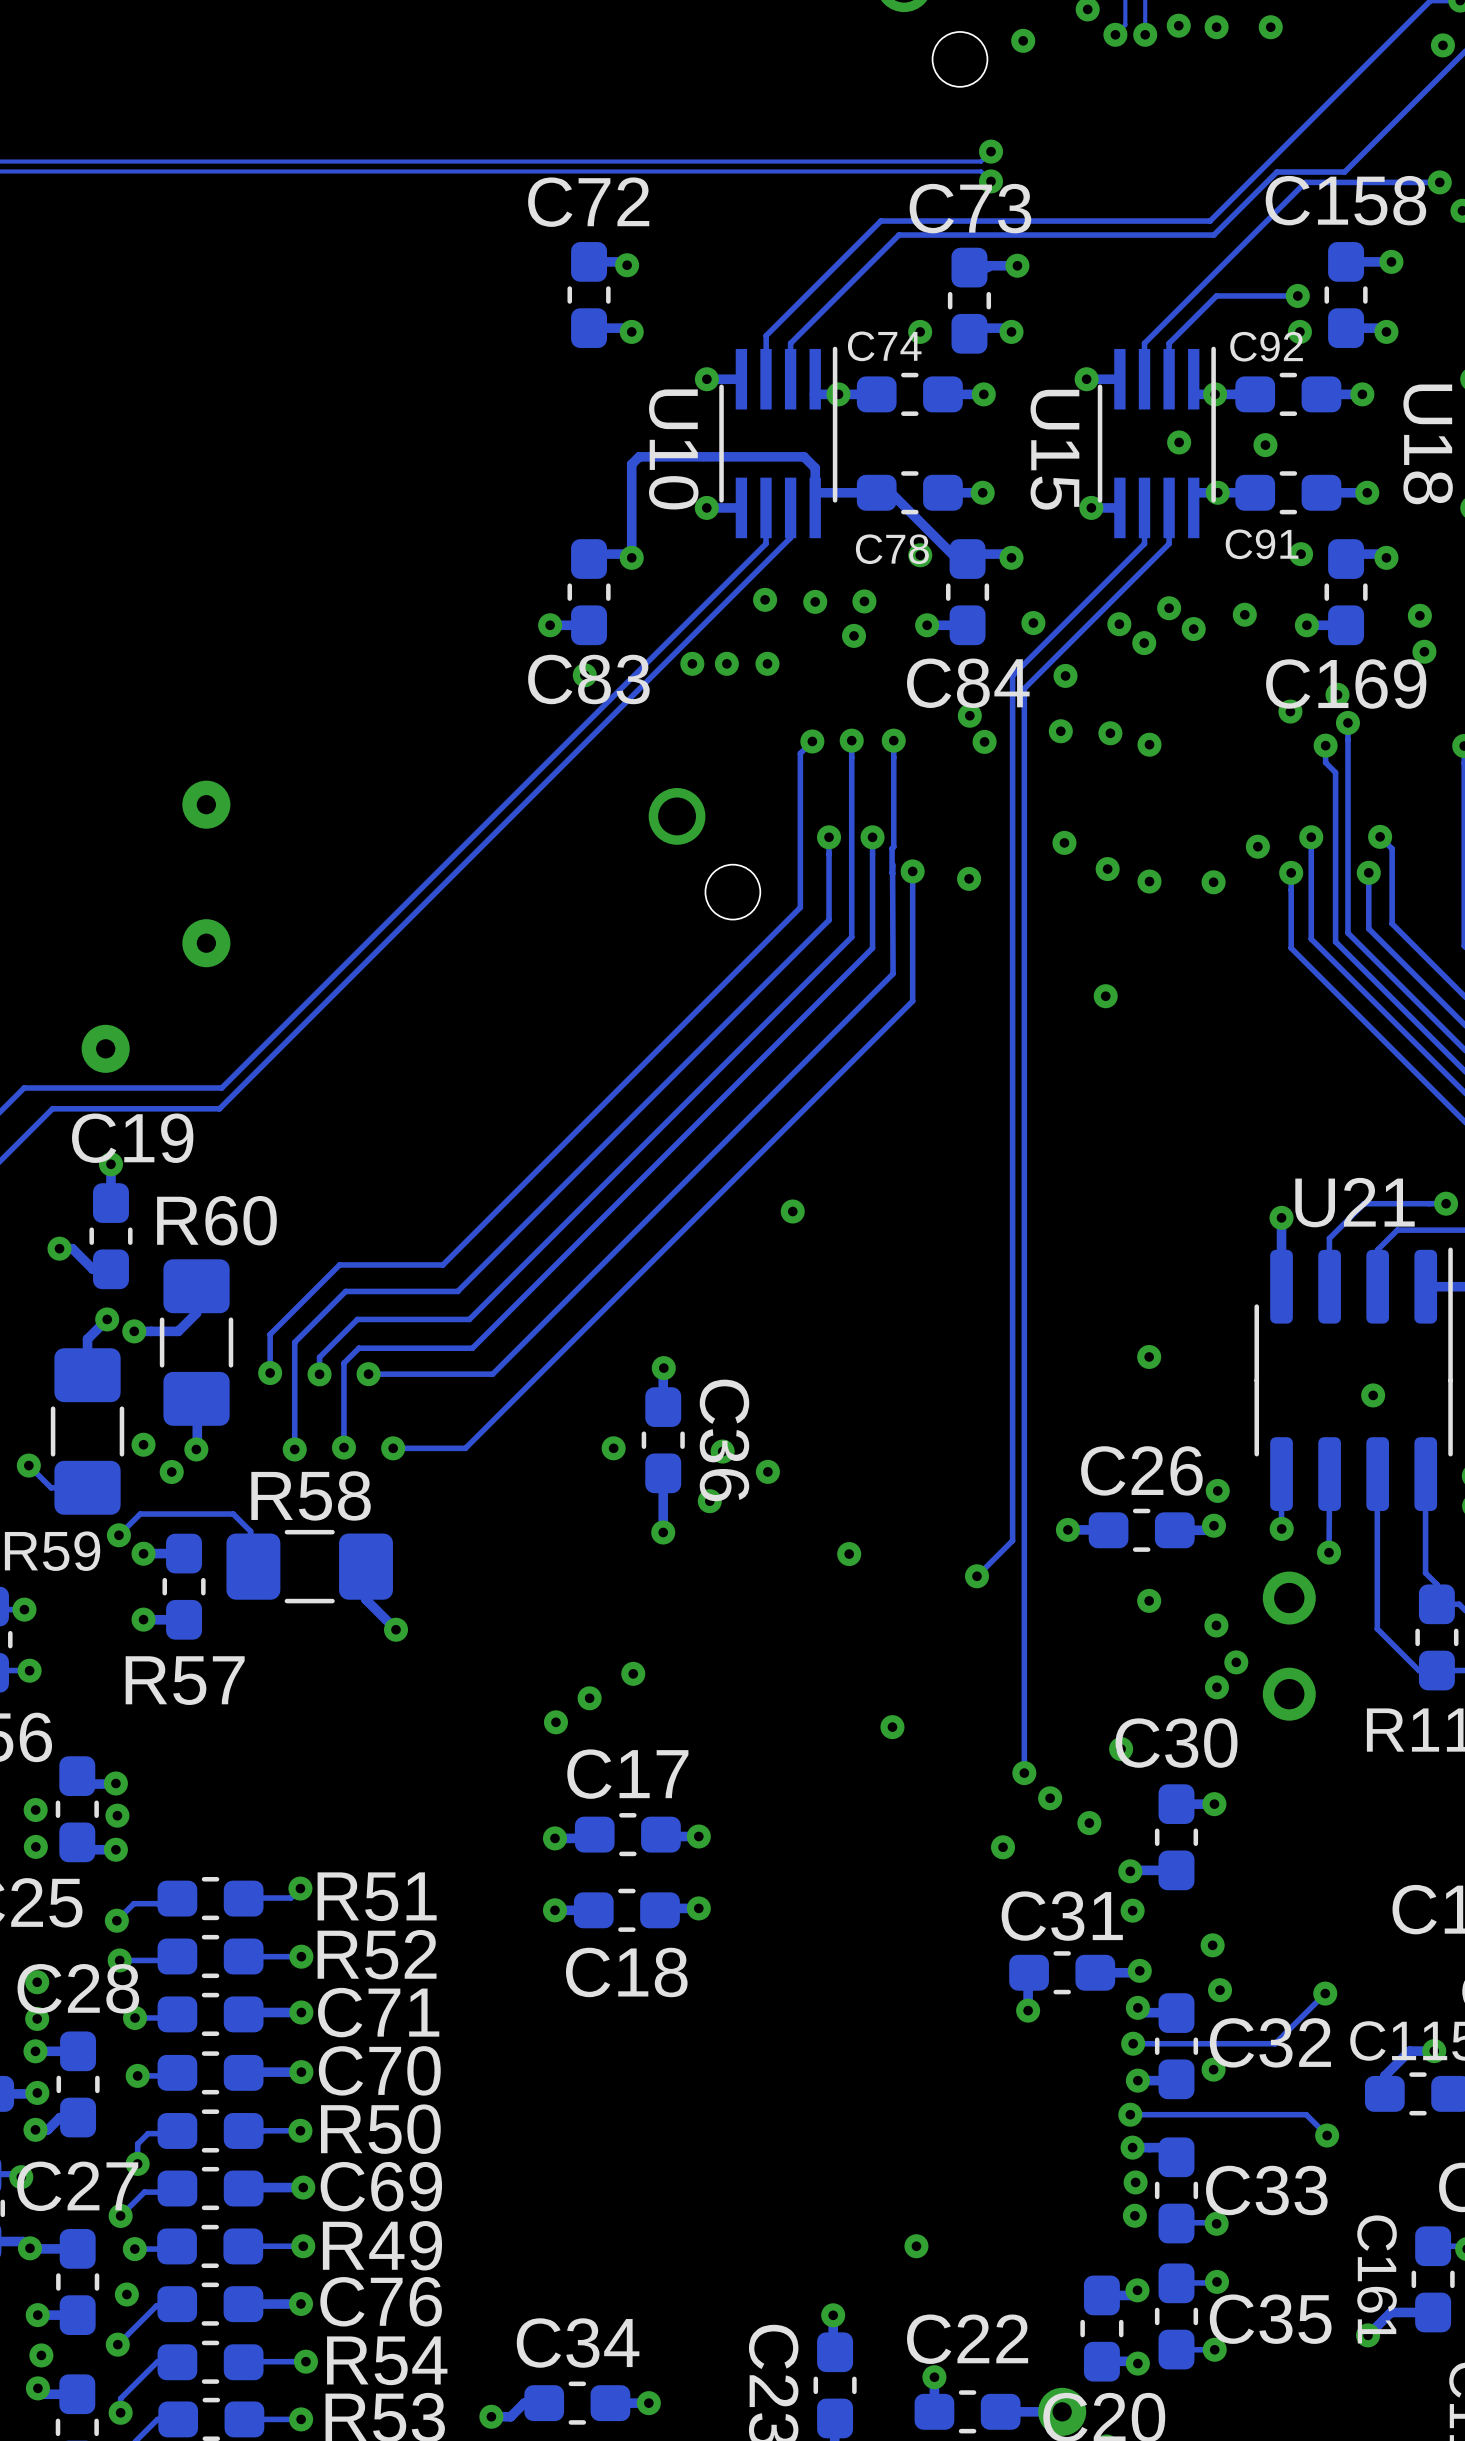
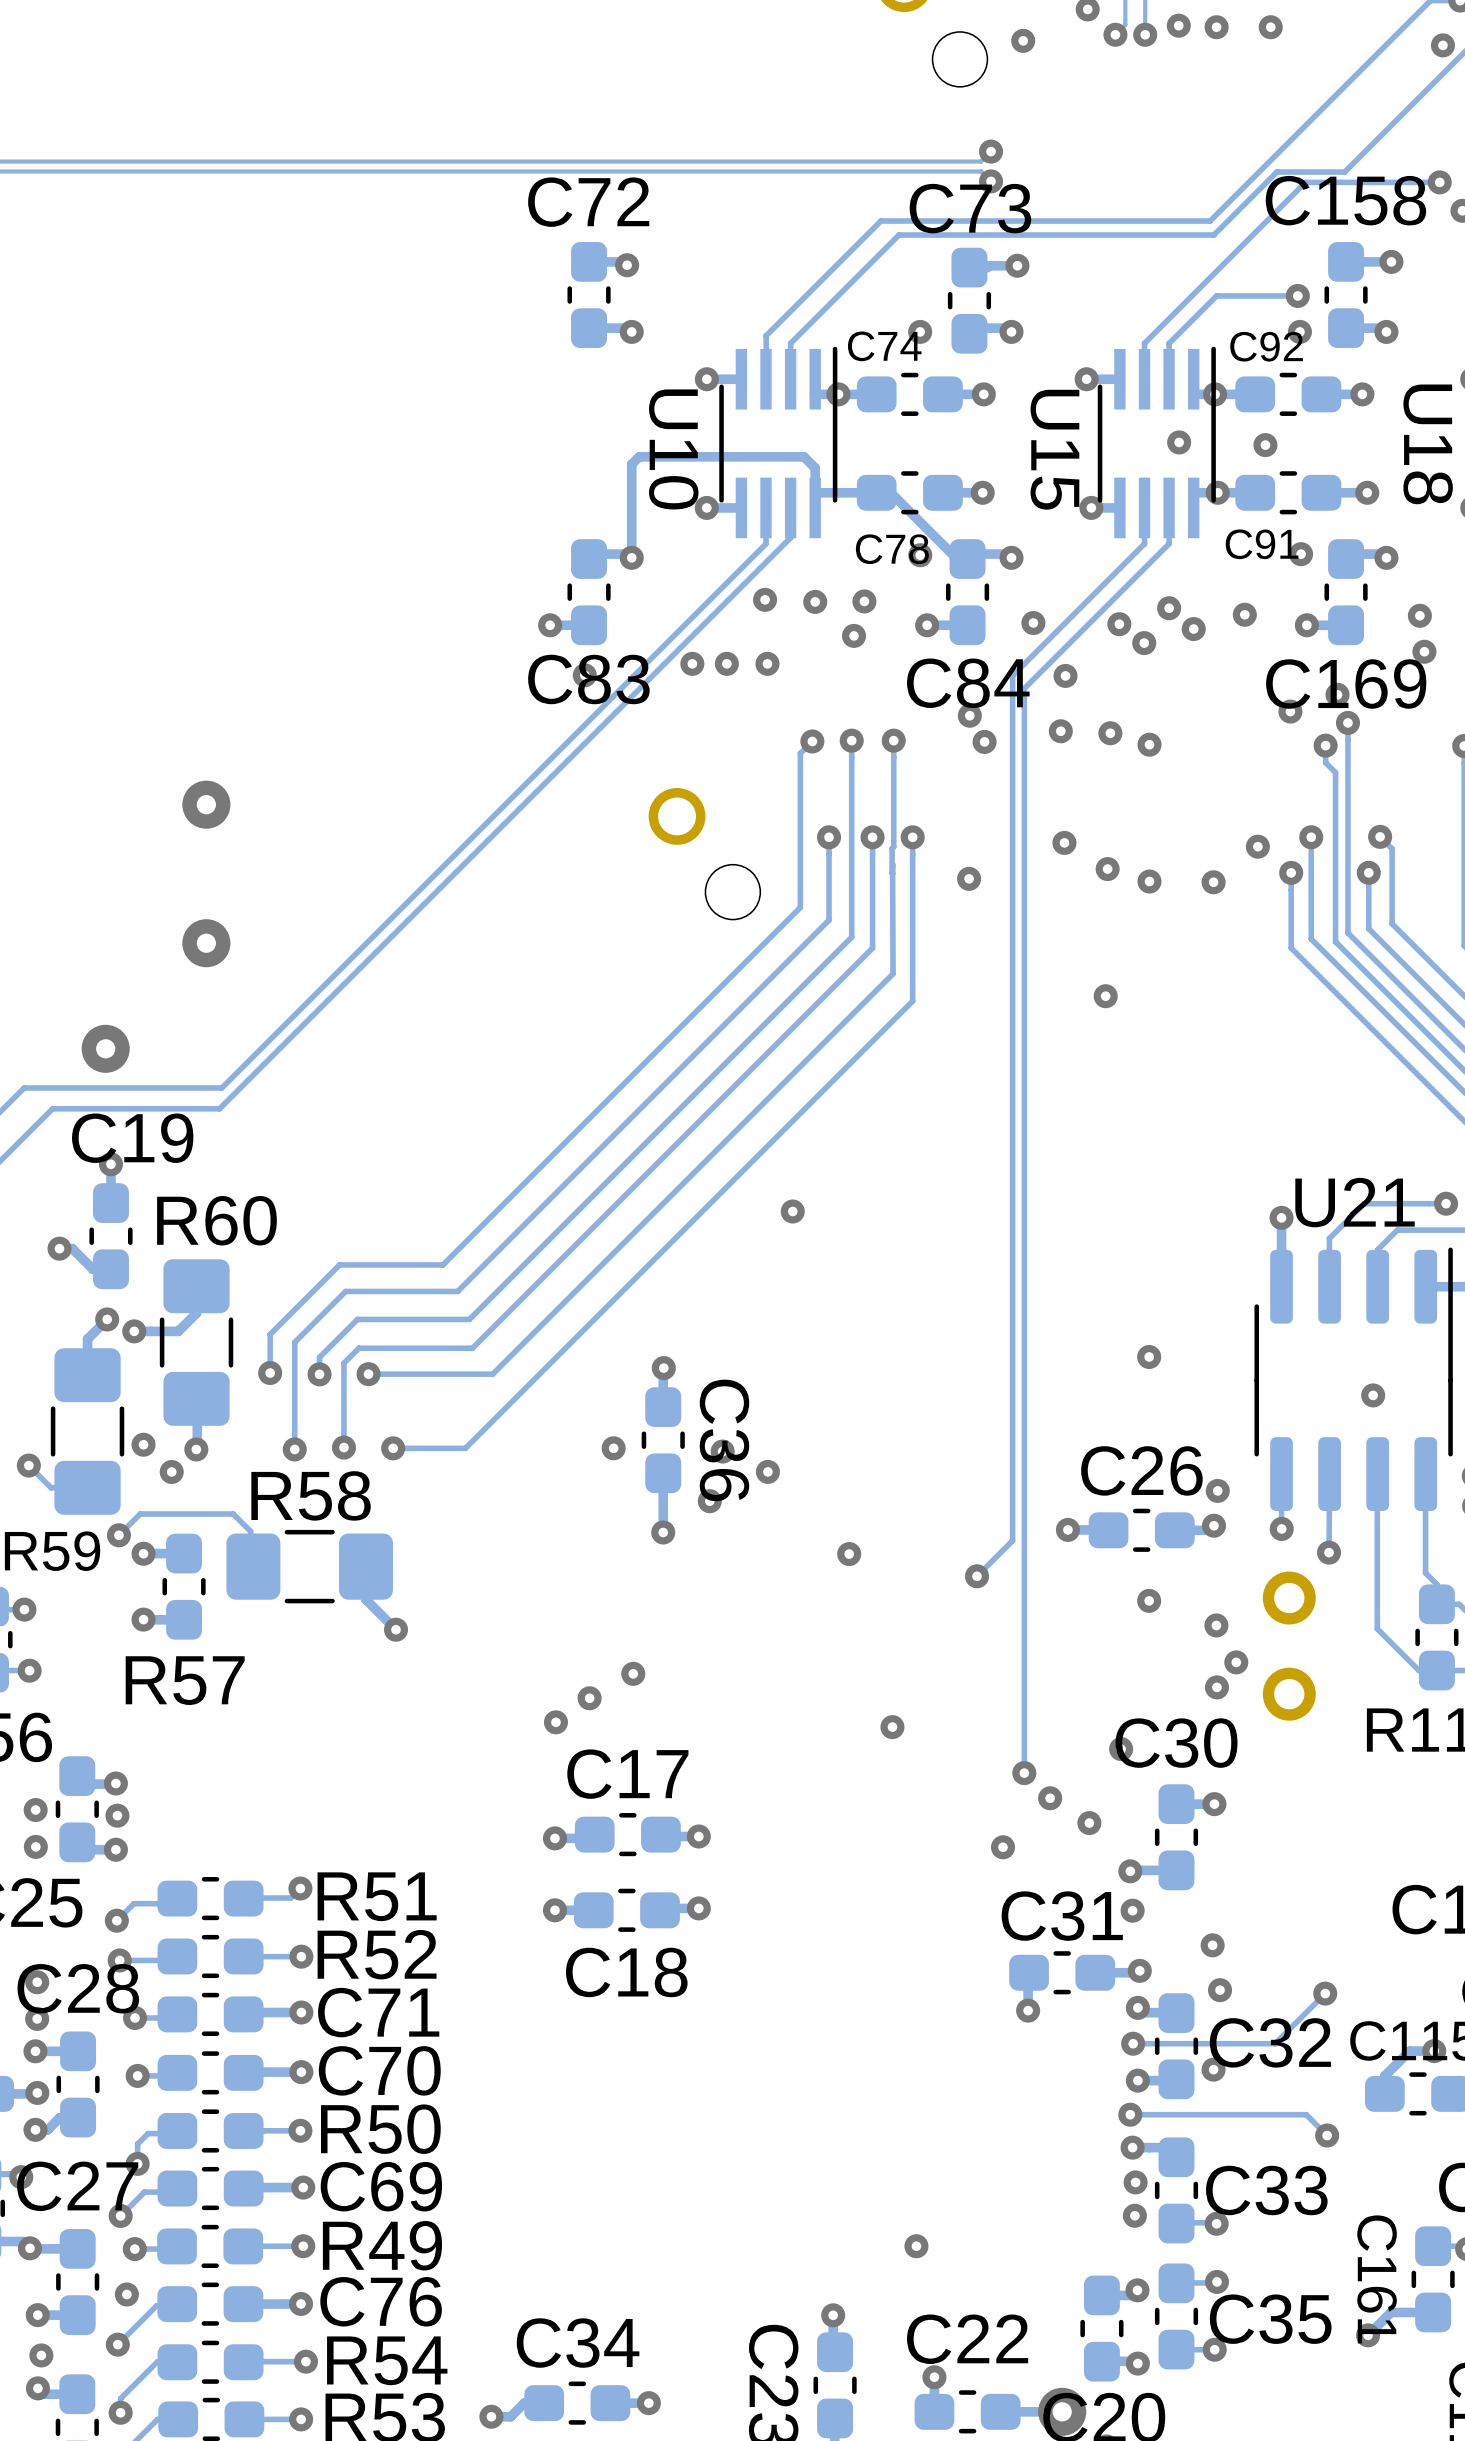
track: none -> (912, 837) (912, 871)
via position: (912, 871) -> (912, 837)

